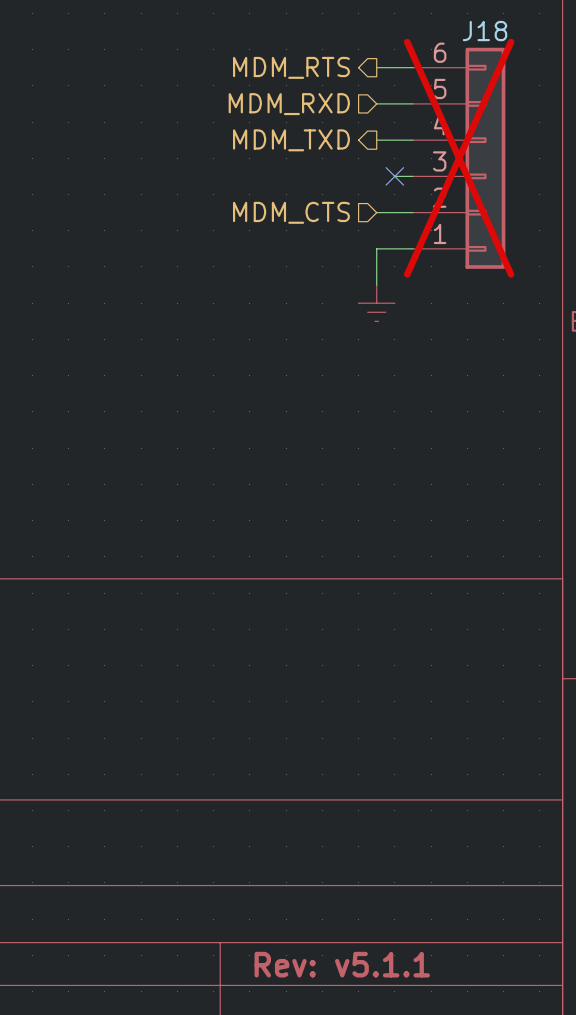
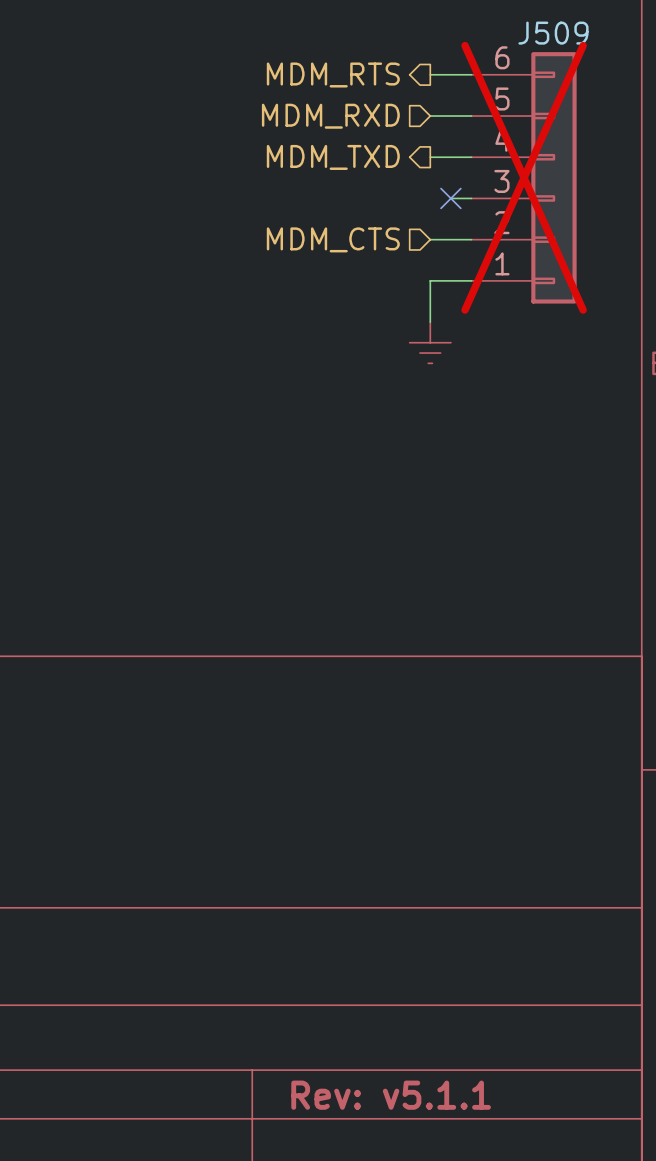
J18 name: J18 (484, 31) -> J509 (553, 33)

